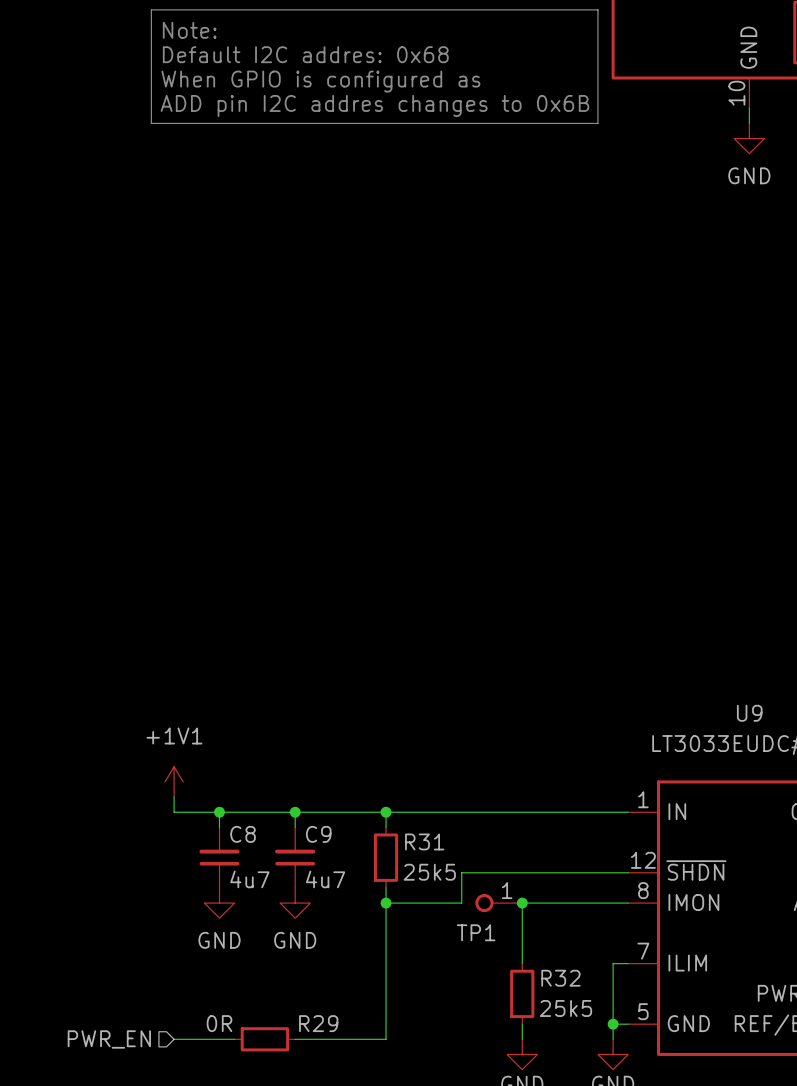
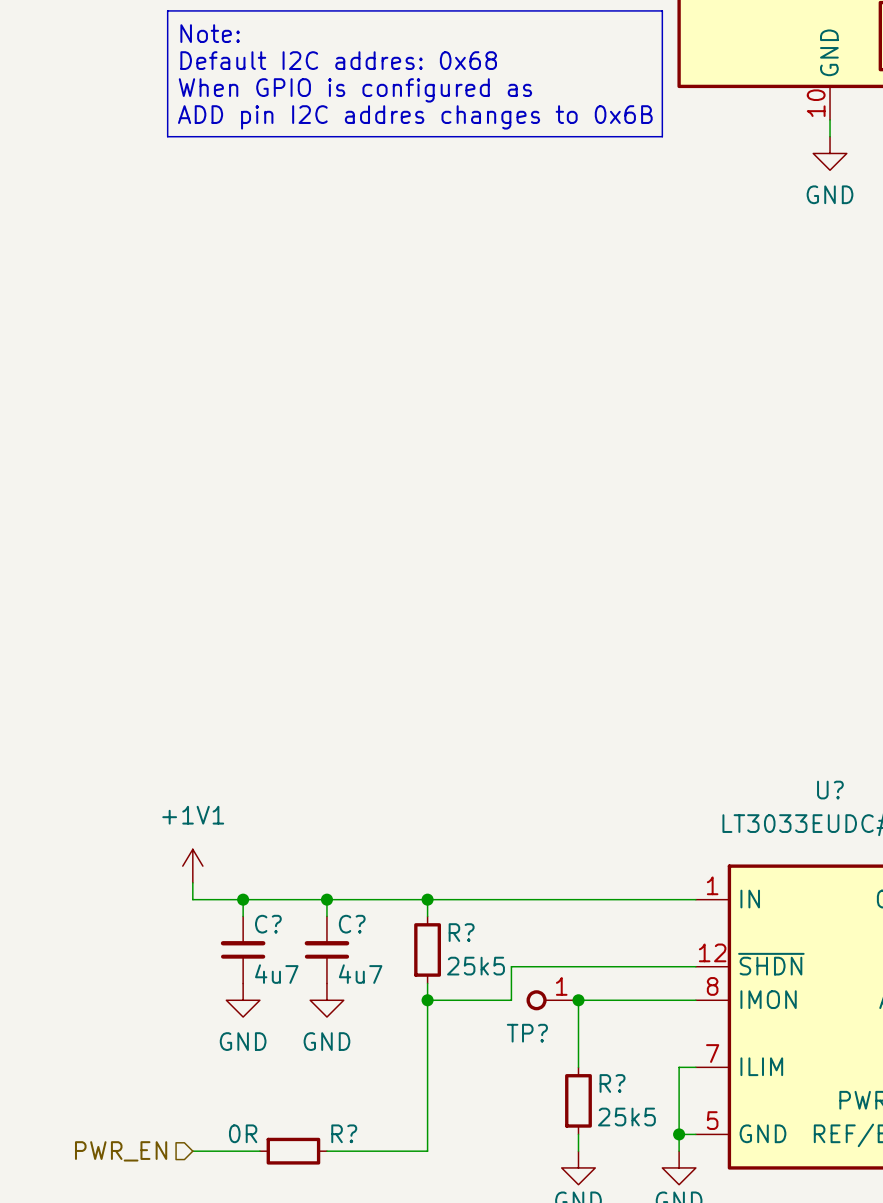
U9 name: U9 (749, 713) -> U? (830, 790)
C8 name: C8 (243, 834) -> C? (268, 924)
C9 name: C9 (318, 834) -> C? (352, 924)
R31 name: R31 (424, 841) -> R? (461, 932)
TP1 name: TP1 (476, 932) -> TP? (527, 1033)
R32 name: R32 (560, 978) -> R? (612, 1083)
R29 name: R29 (318, 1023) -> R? (344, 1133)

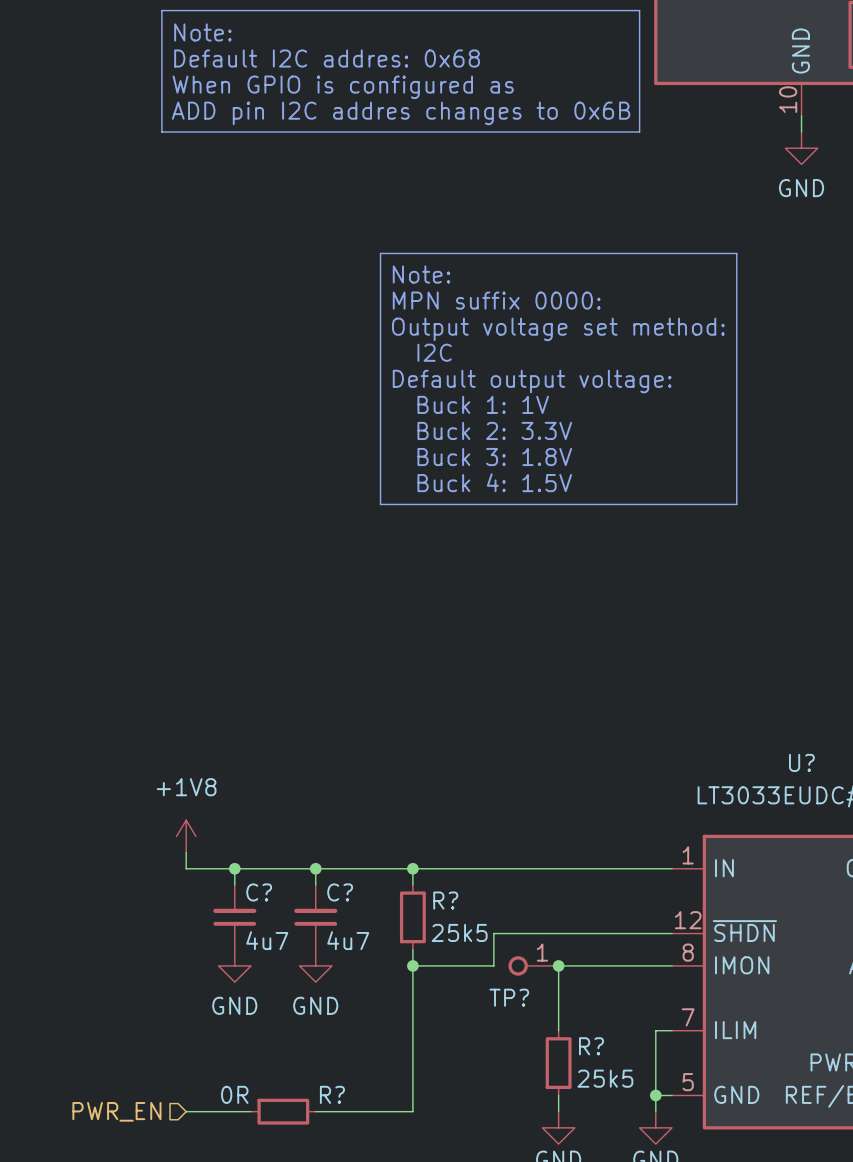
line: none -> (380, 253) (380, 504) (736, 504) (736, 253) (380, 253)
text: none -> Note: (421, 274)
text: none -> MPN suffix 0000: (496, 300)
text: none -> Output voltage set method: (558, 329)
text: none -> I2C (434, 352)
text: none -> Default output voltage: (532, 381)
text: none -> Buck 1: 1V (483, 404)
text: none -> Buck 2: 3.3V (494, 430)
text: none -> Buck 3: 1.8V (494, 457)
text: none -> Buck 4: 1.5V (494, 482)
power symbol: +1V1 (192, 866) -> +1V8 (186, 836)

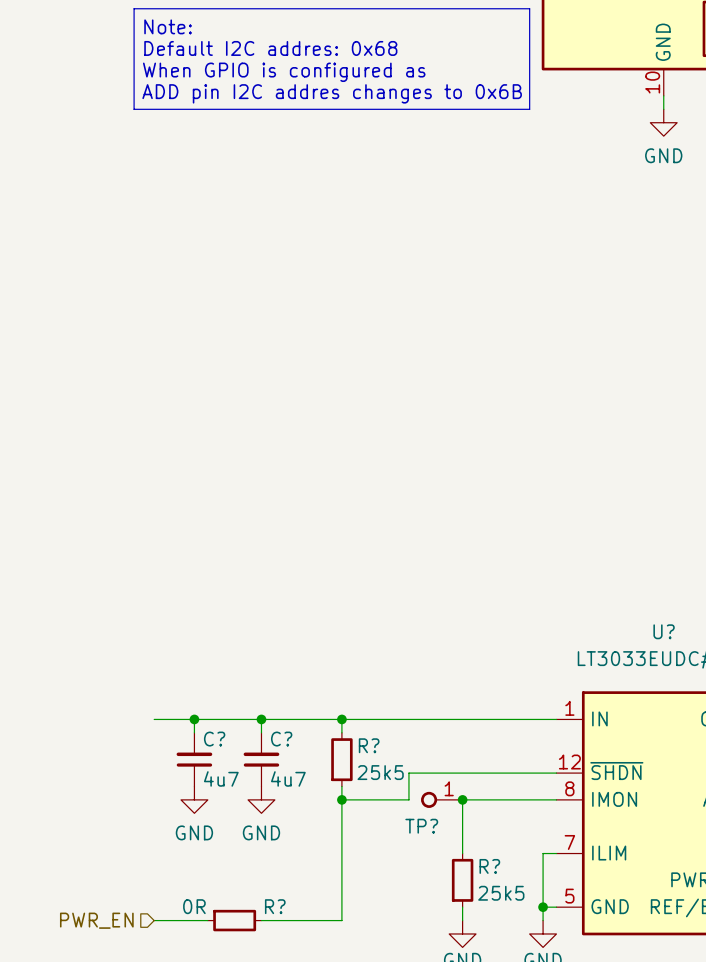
line: (380, 253) (380, 504) (736, 504) (736, 253) (380, 253) -> none
text: Note: (421, 274) -> none
text: MPN suffix 0000: (496, 300) -> none
text: Output voltage set method: (558, 329) -> none
text: I2C (434, 352) -> none
text: Default output voltage: (532, 381) -> none
text: Buck 1: 1V (483, 404) -> none
text: Buck 2: 3.3V (494, 430) -> none
text: Buck 3: 1.8V (494, 457) -> none
text: Buck 4: 1.5V (494, 482) -> none
power symbol: +1V8 (186, 836) -> none
wire: (186, 852) (186, 868) -> none

